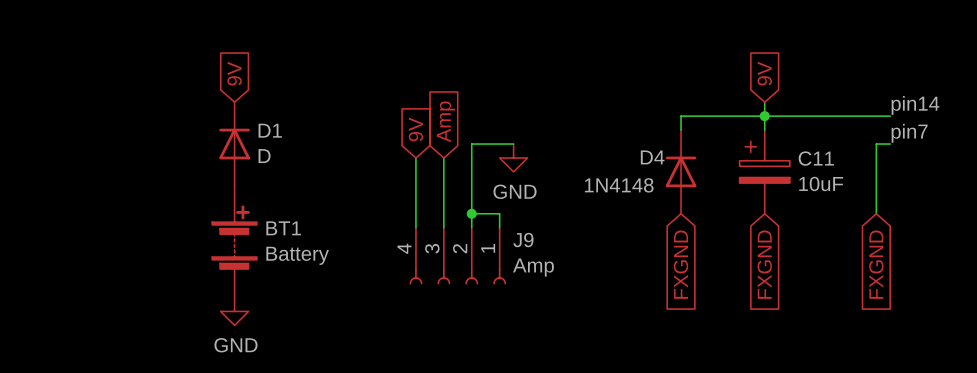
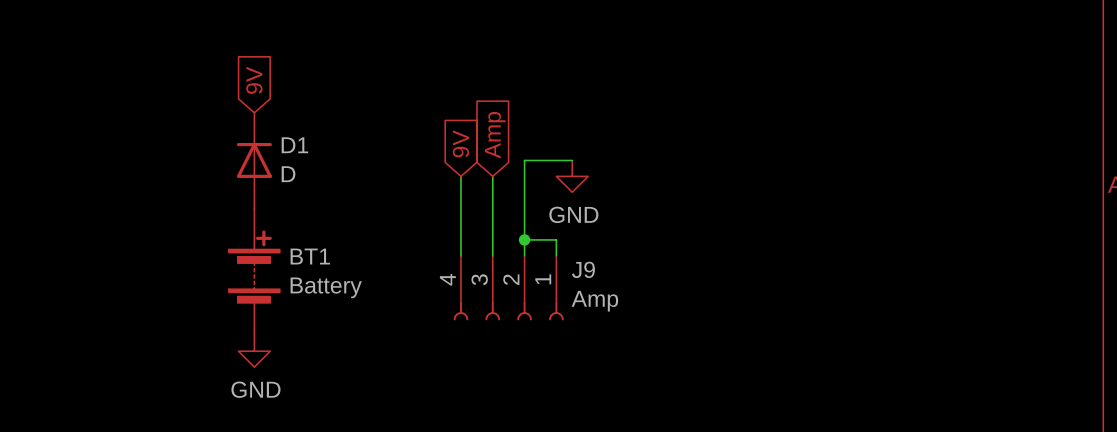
global label: 9V (764, 73) -> none
wire: (764, 102) (764, 130) -> none
label: pin14 (915, 105) -> none
junction: (764, 116) -> none
wire: (890, 116) (681, 116) (681, 130) -> none
label: pin7 (909, 133) -> none
wire: (890, 144) (876, 144) (876, 213) -> none
D4: 1N4148 (681, 171) -> none
C11: 10uF (764, 171) -> none
global label: FXGND (681, 264) -> none
global label: FXGND (764, 264) -> none
global label: FXGND (876, 264) -> none

